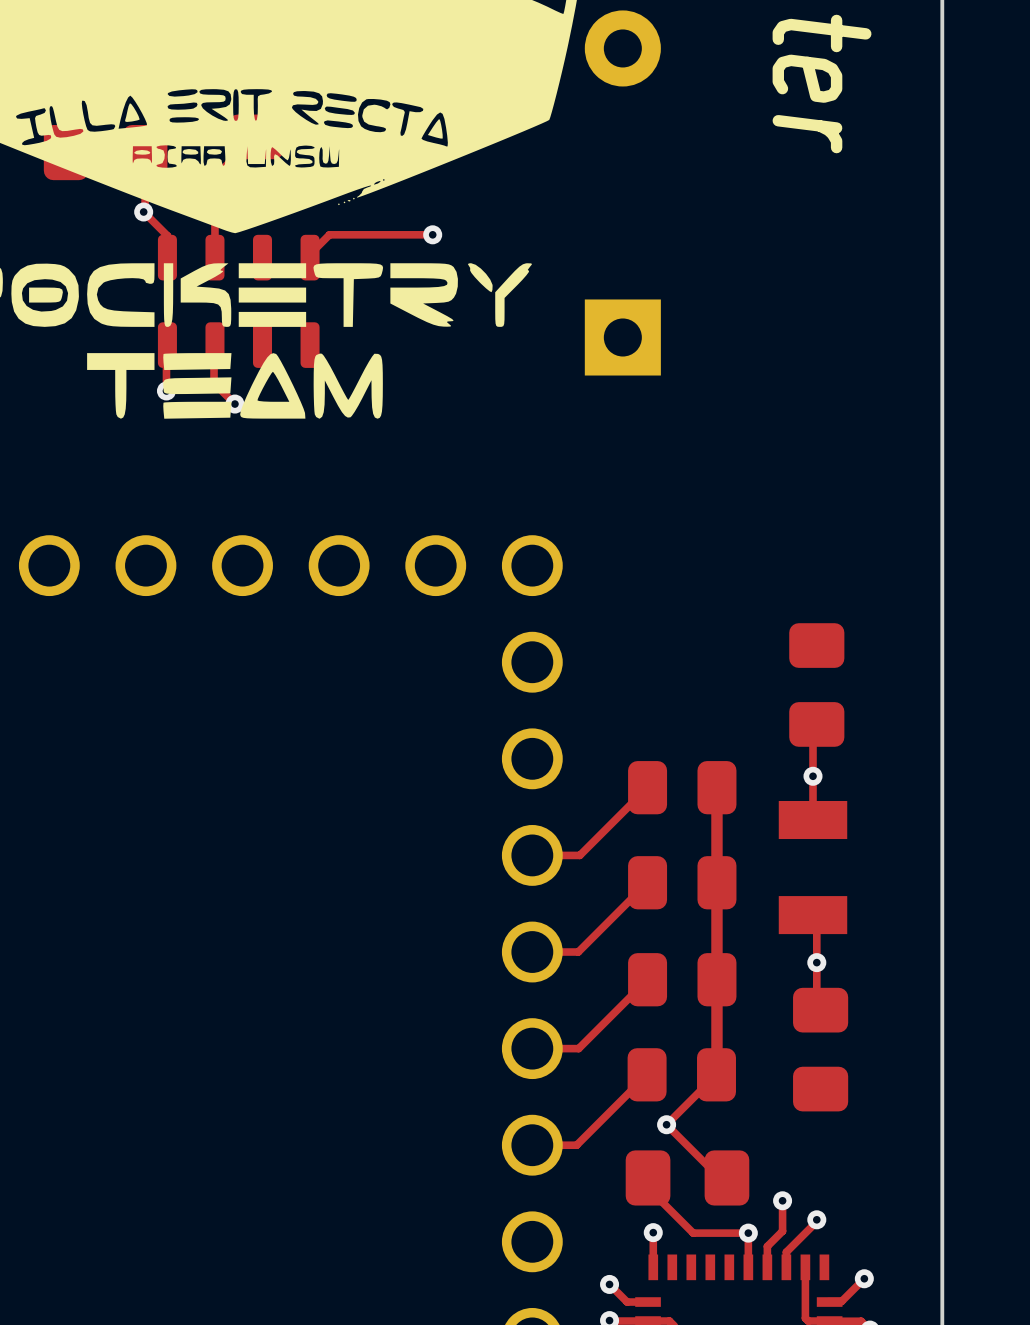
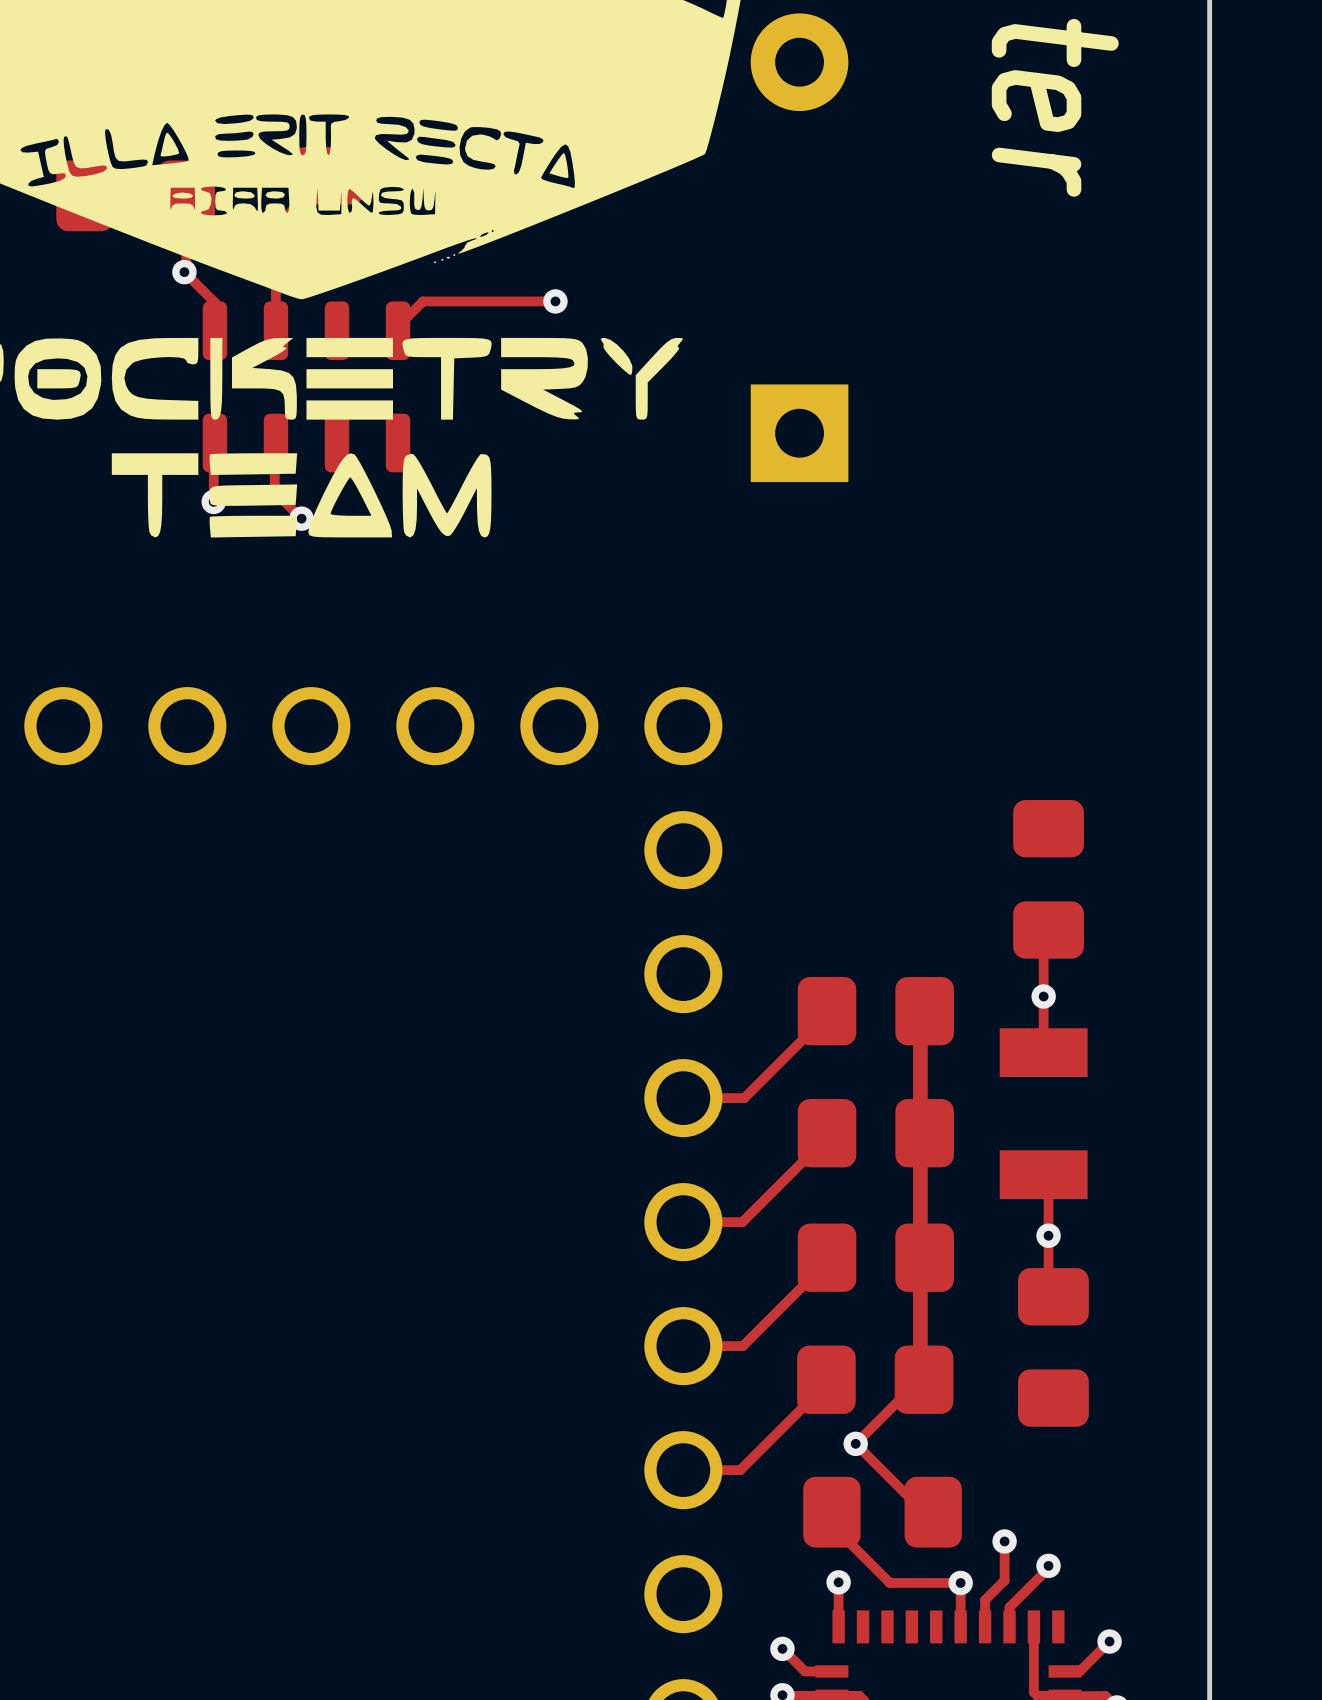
part footprint: [628, 761, 737, 815] -> [797, 976, 954, 1046]
part footprint: [628, 856, 737, 910] -> [797, 1099, 954, 1168]
part footprint: [628, 953, 737, 1007] -> [797, 1223, 954, 1292]
part footprint: [627, 1048, 736, 1102] -> [797, 1345, 954, 1414]

